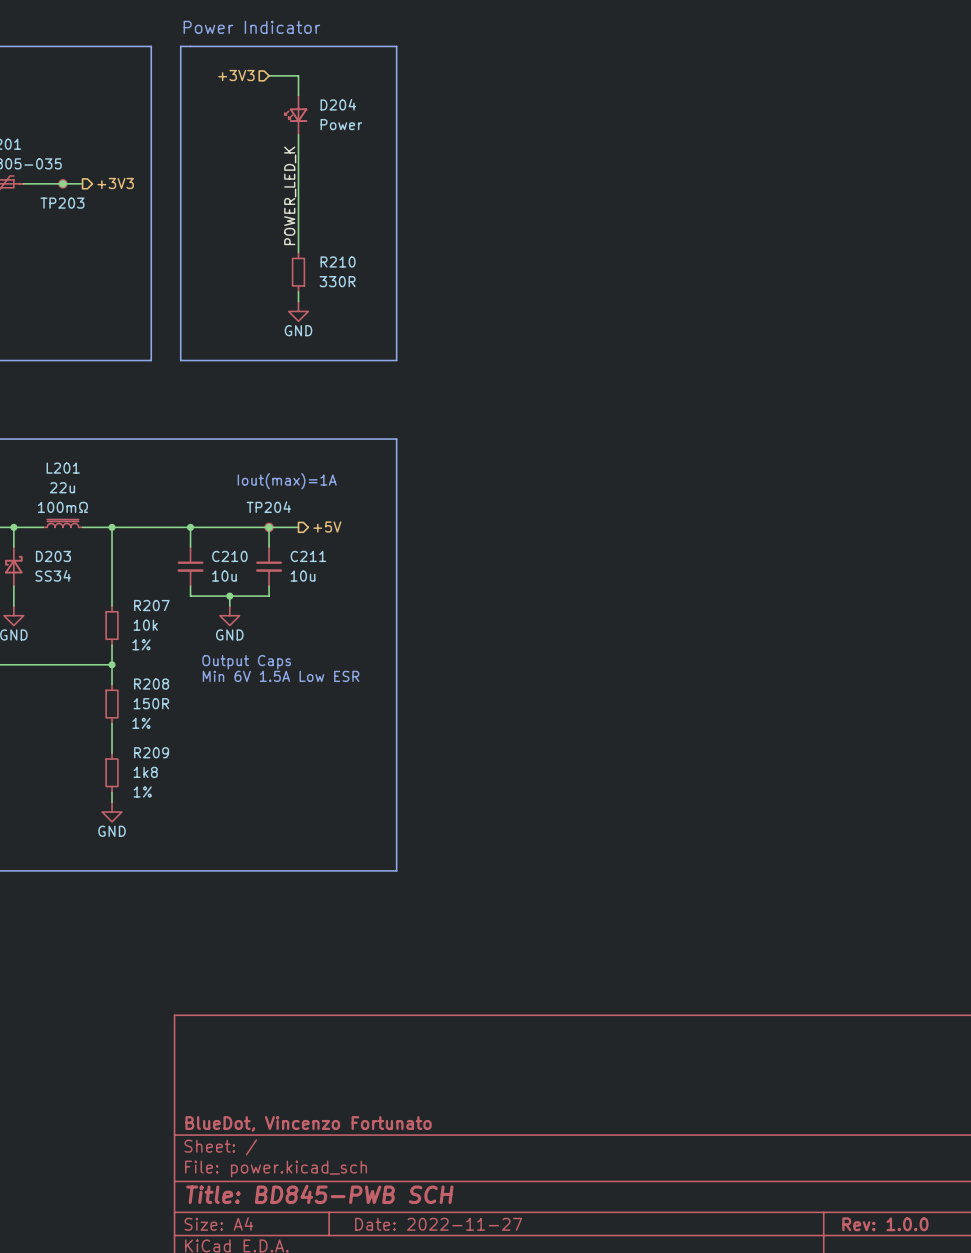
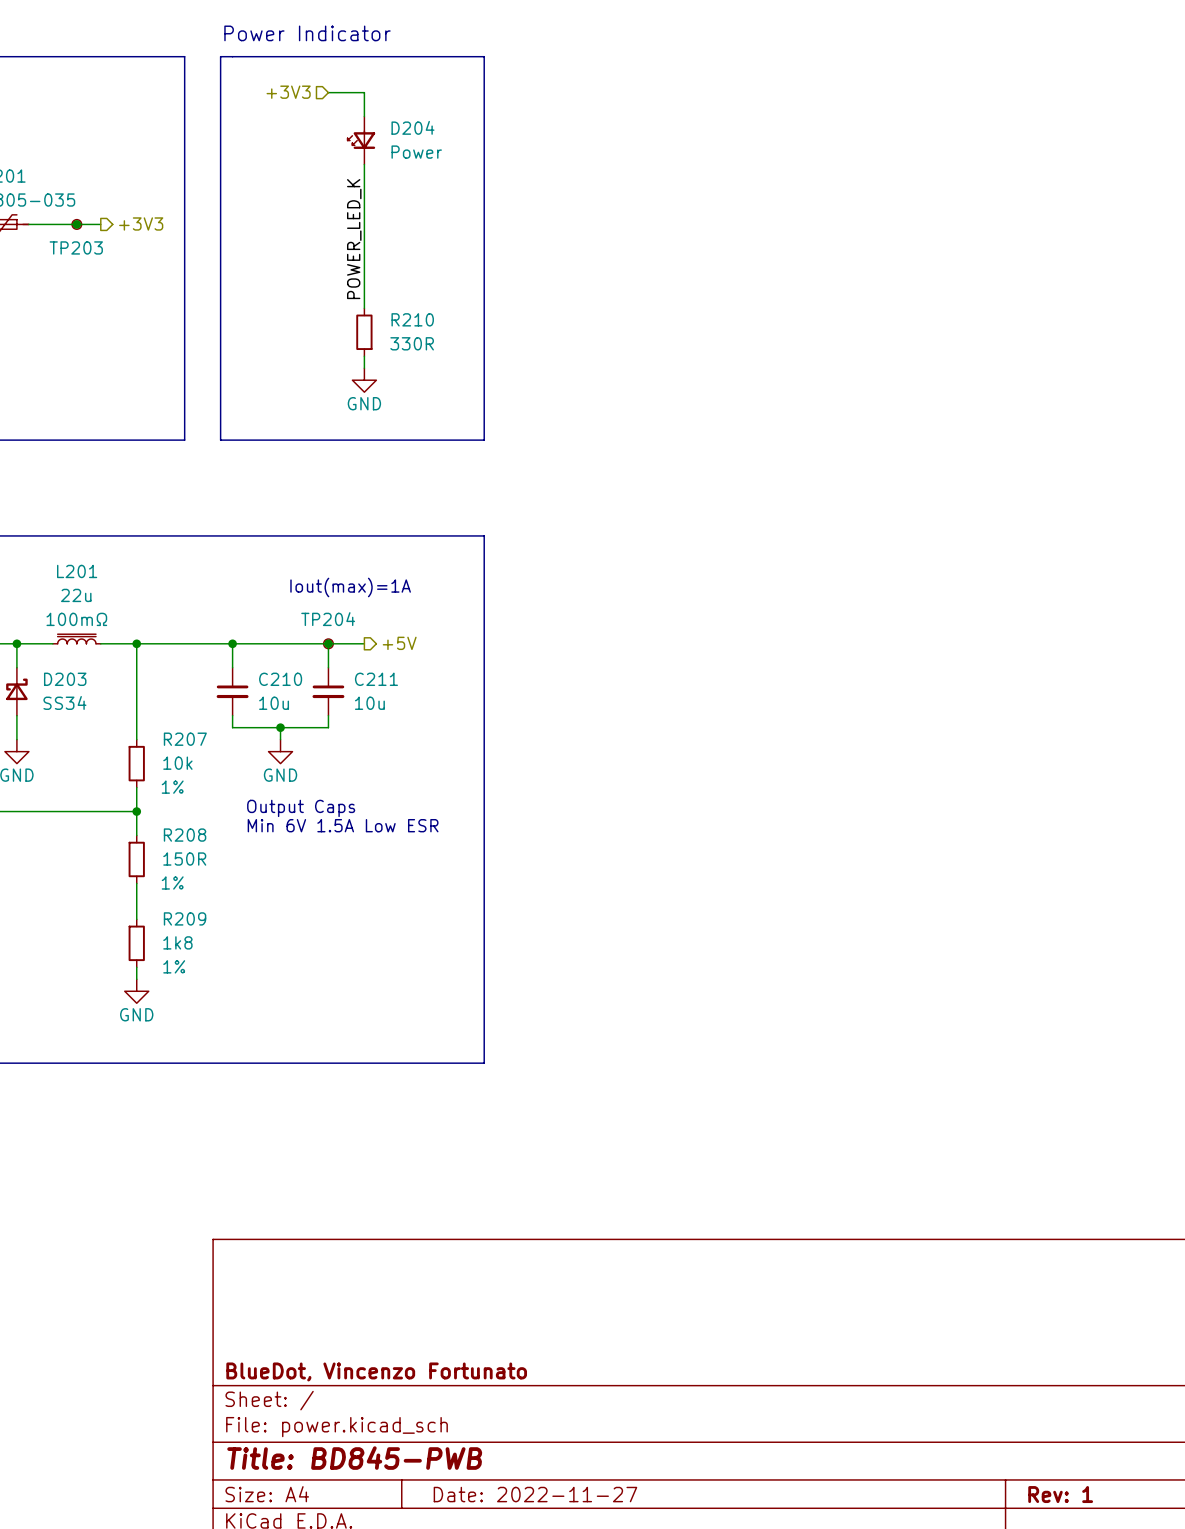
title block: Title: BD845-PWB SCH (319, 1194) -> Title: BD845-PWB (354, 1458)
title block: Rev: 1.0.0 (885, 1224) -> Rev: 1 (1060, 1494)

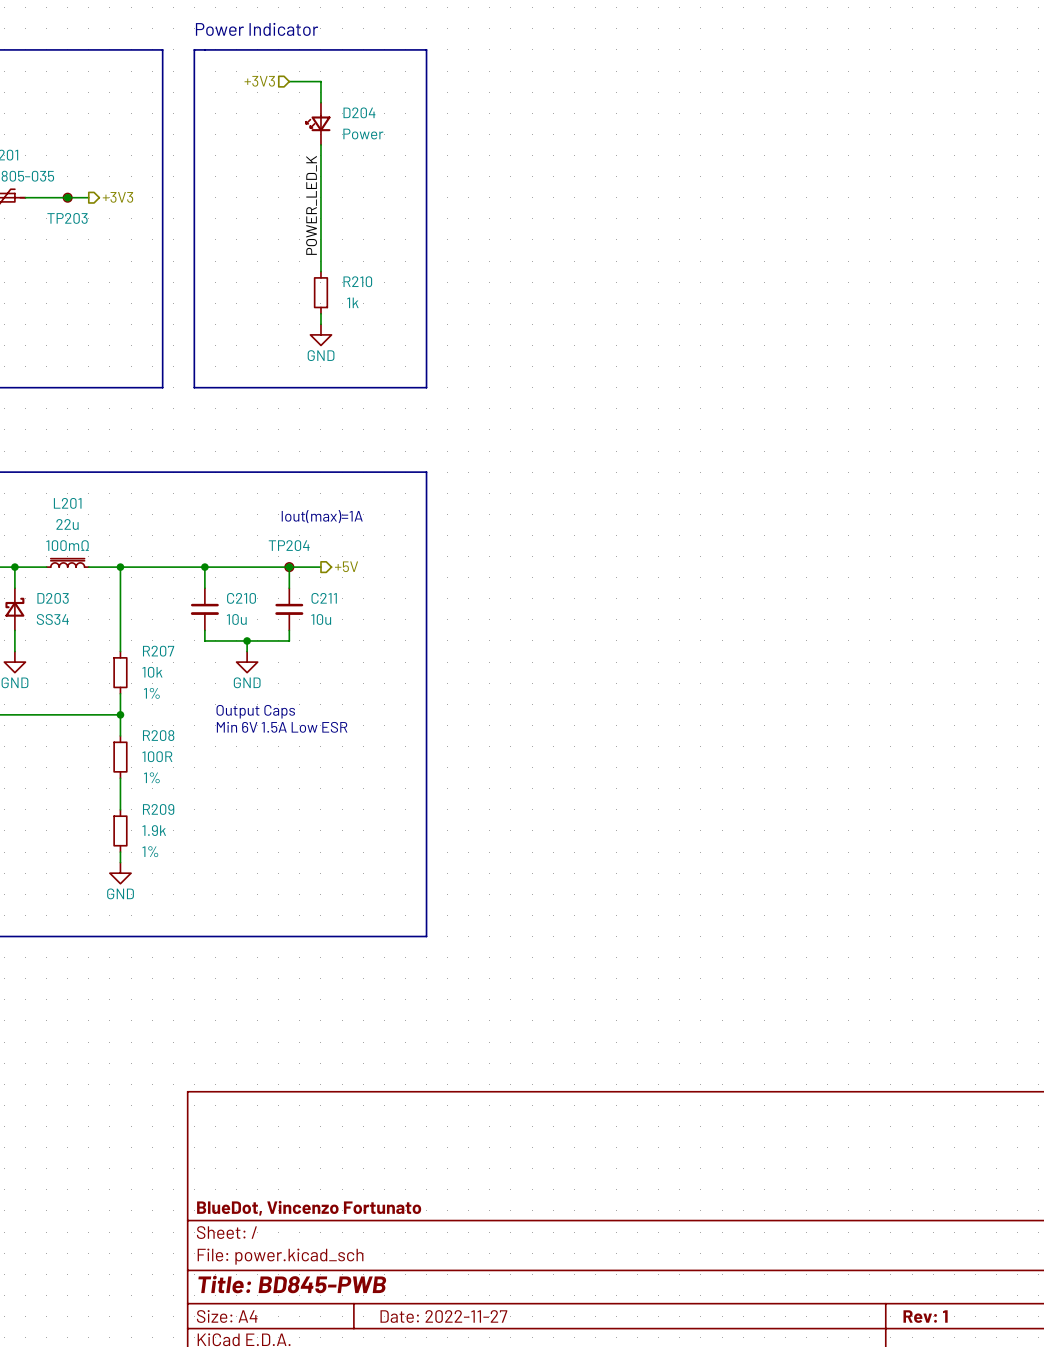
R210 value: 330R (412, 343) -> 1k (352, 302)
R208 value: 150R (184, 859) -> 100R (157, 756)
R209 value: 1k8 (177, 942) -> 1.9k (154, 830)

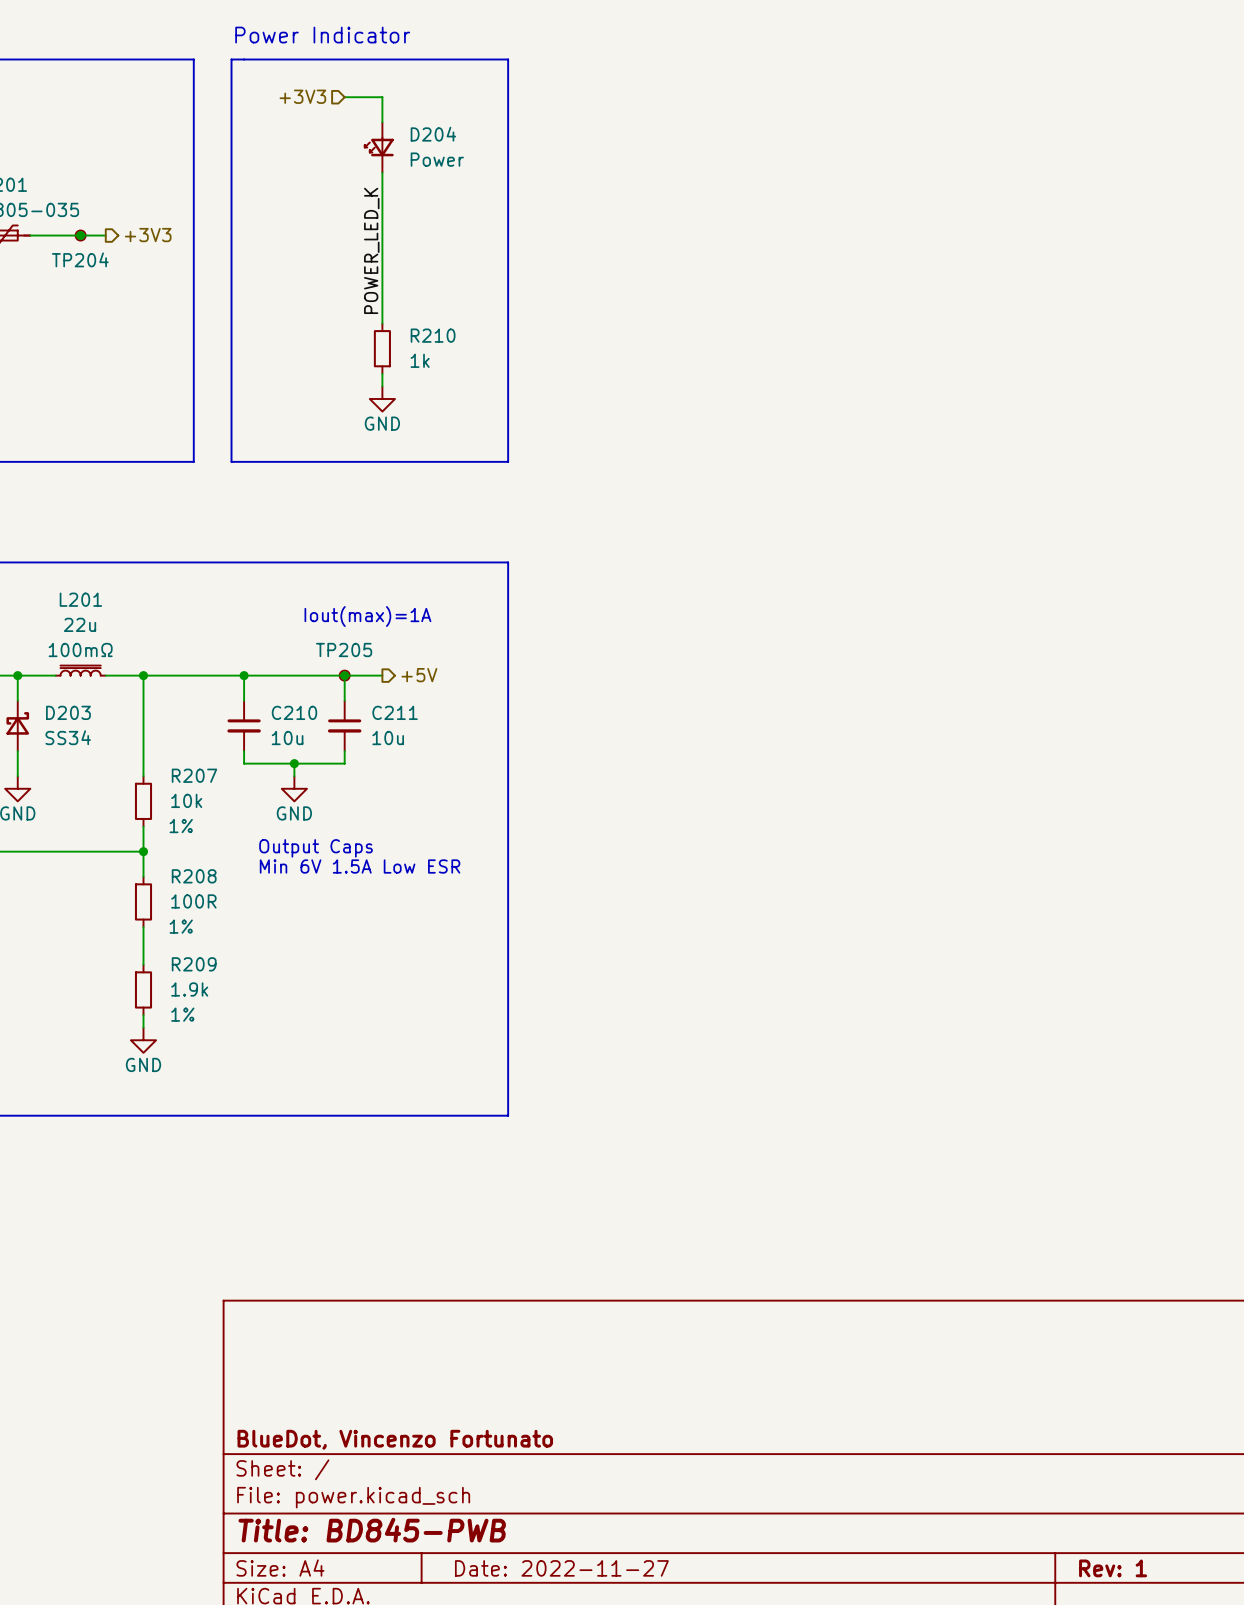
TP203 name: TP203 (67, 218) -> TP204 (80, 259)
TP204 name: TP204 (289, 545) -> TP205 (344, 650)

